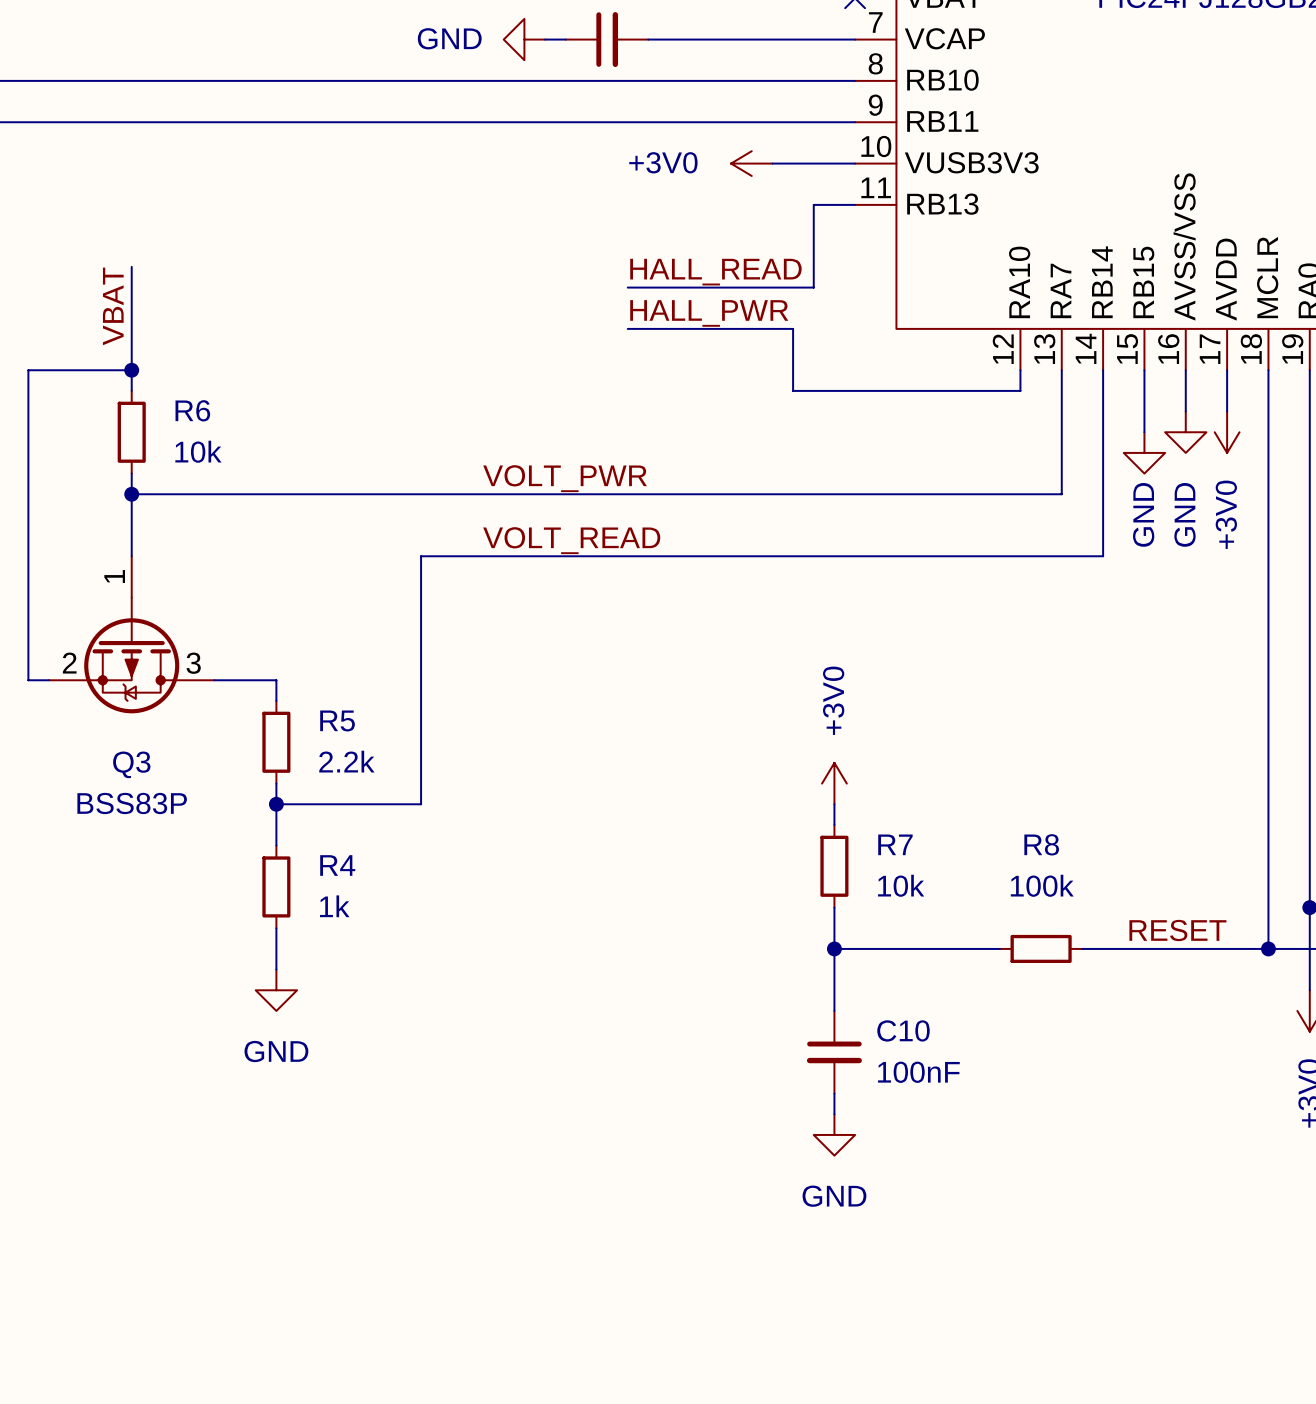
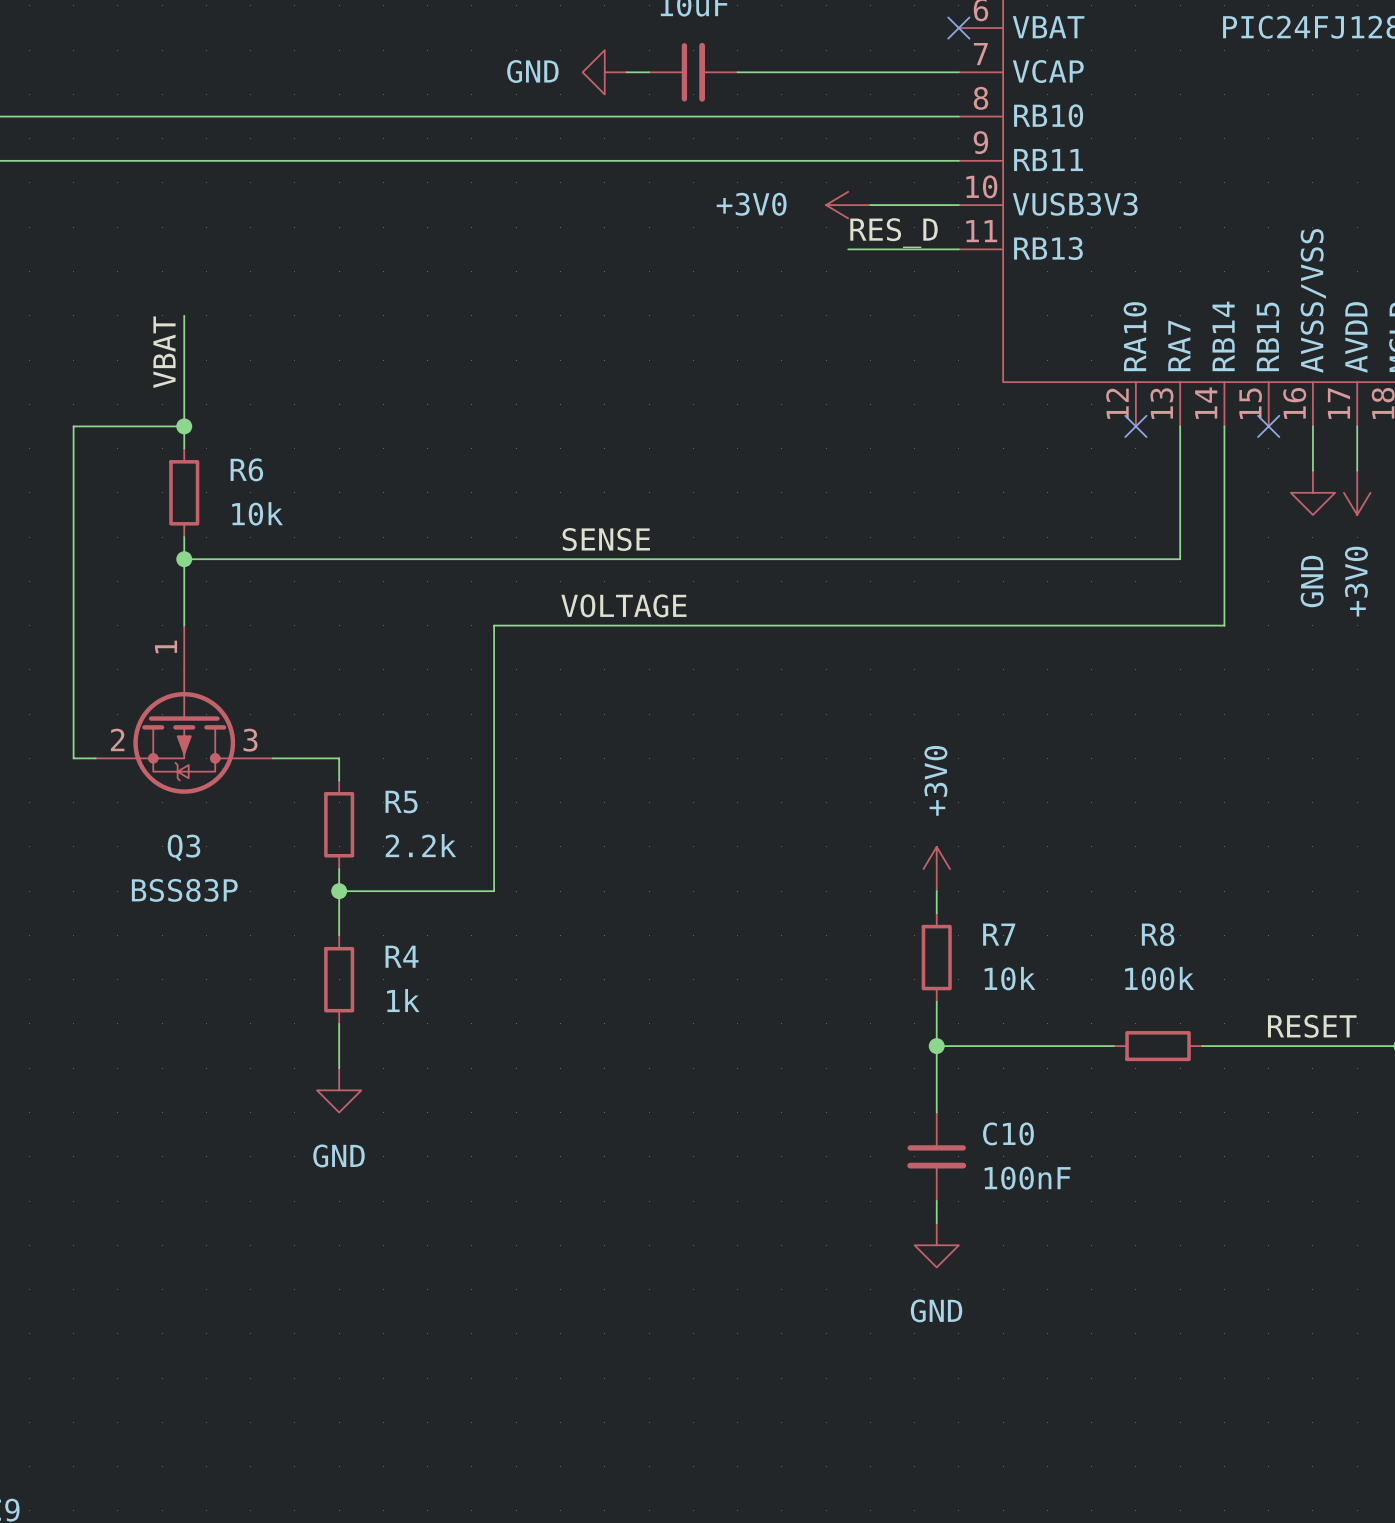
label: none -> RES_D (894, 232)
wire: (813, 204) (813, 287) (627, 287) -> (914, 249) (848, 249)
label: HALL_READ (715, 272) -> none
label: HALL_PWR (709, 313) -> none
wire: (627, 328) (793, 328) (793, 390) (1020, 390) (1020, 370) -> none
no-connect mark: none -> (1135, 426)
wire: (1144, 370) (1144, 432) -> none
no-connect mark: none -> (1268, 426)
power symbol: GND (1144, 452) -> none
label: VOLT_PWR (565, 478) -> SENSE (606, 539)
label: VOLT_READ (571, 540) -> VOLTAGE (623, 605)

